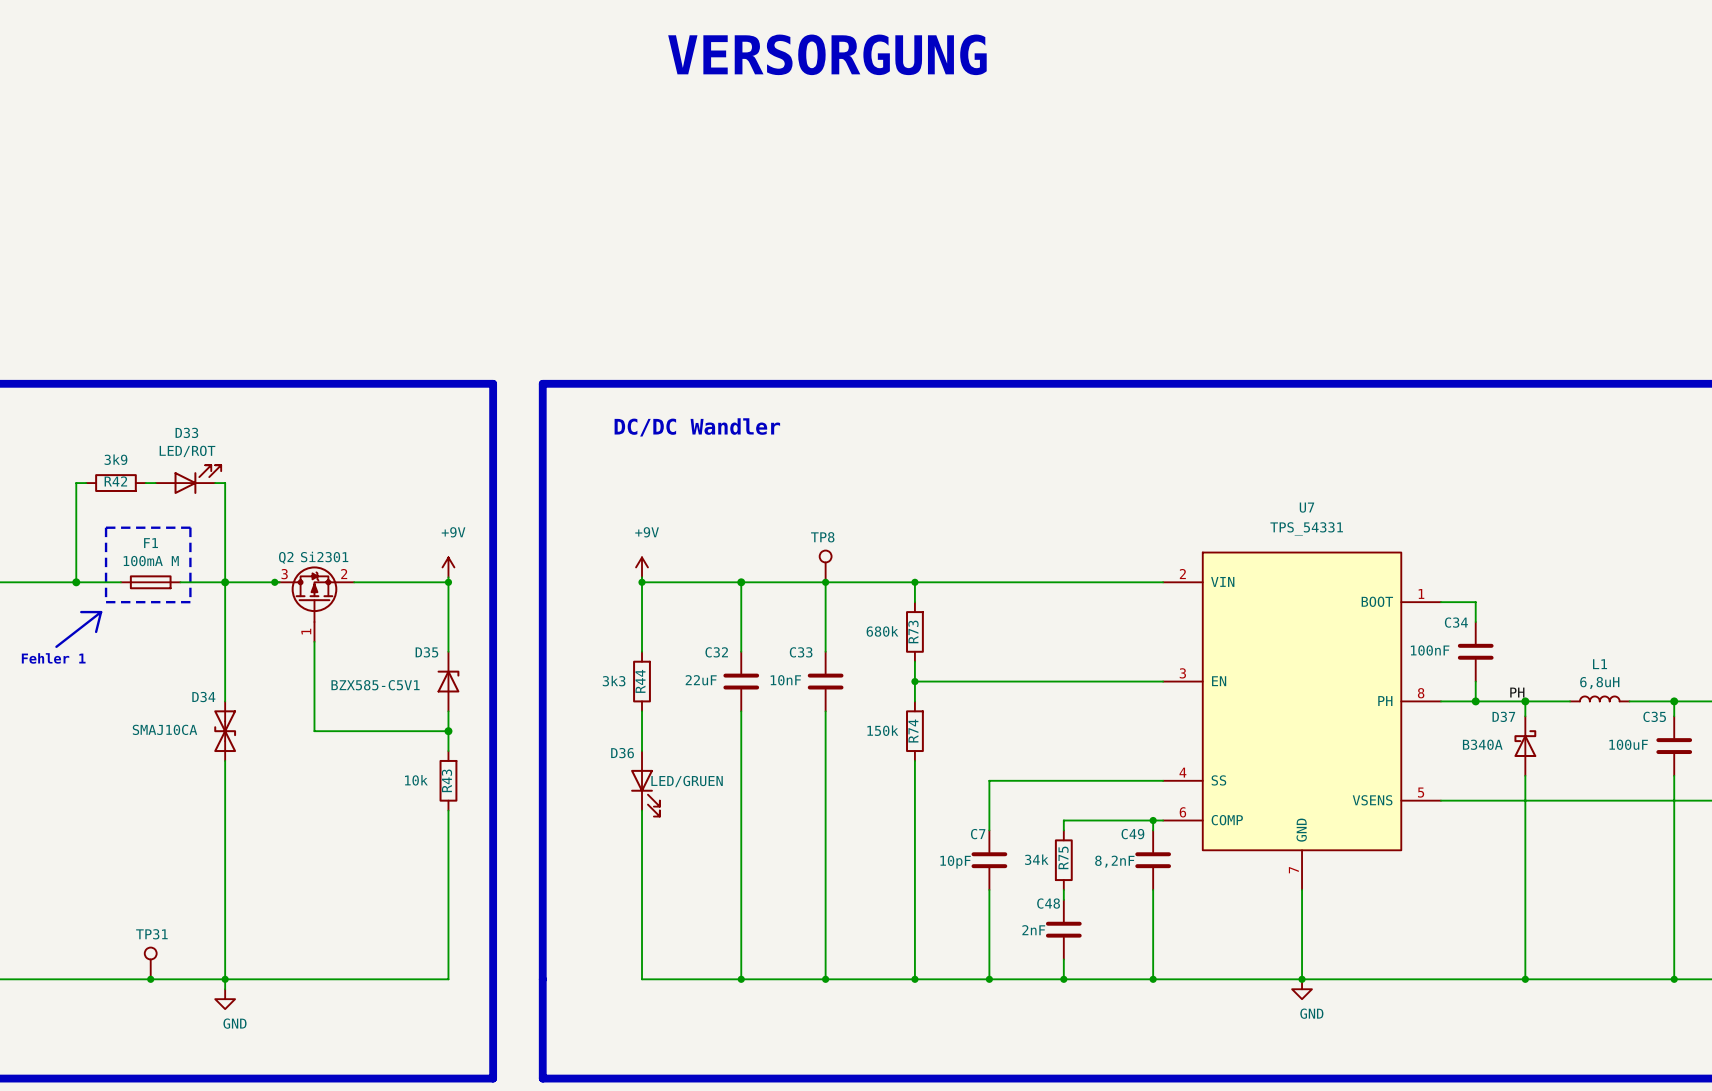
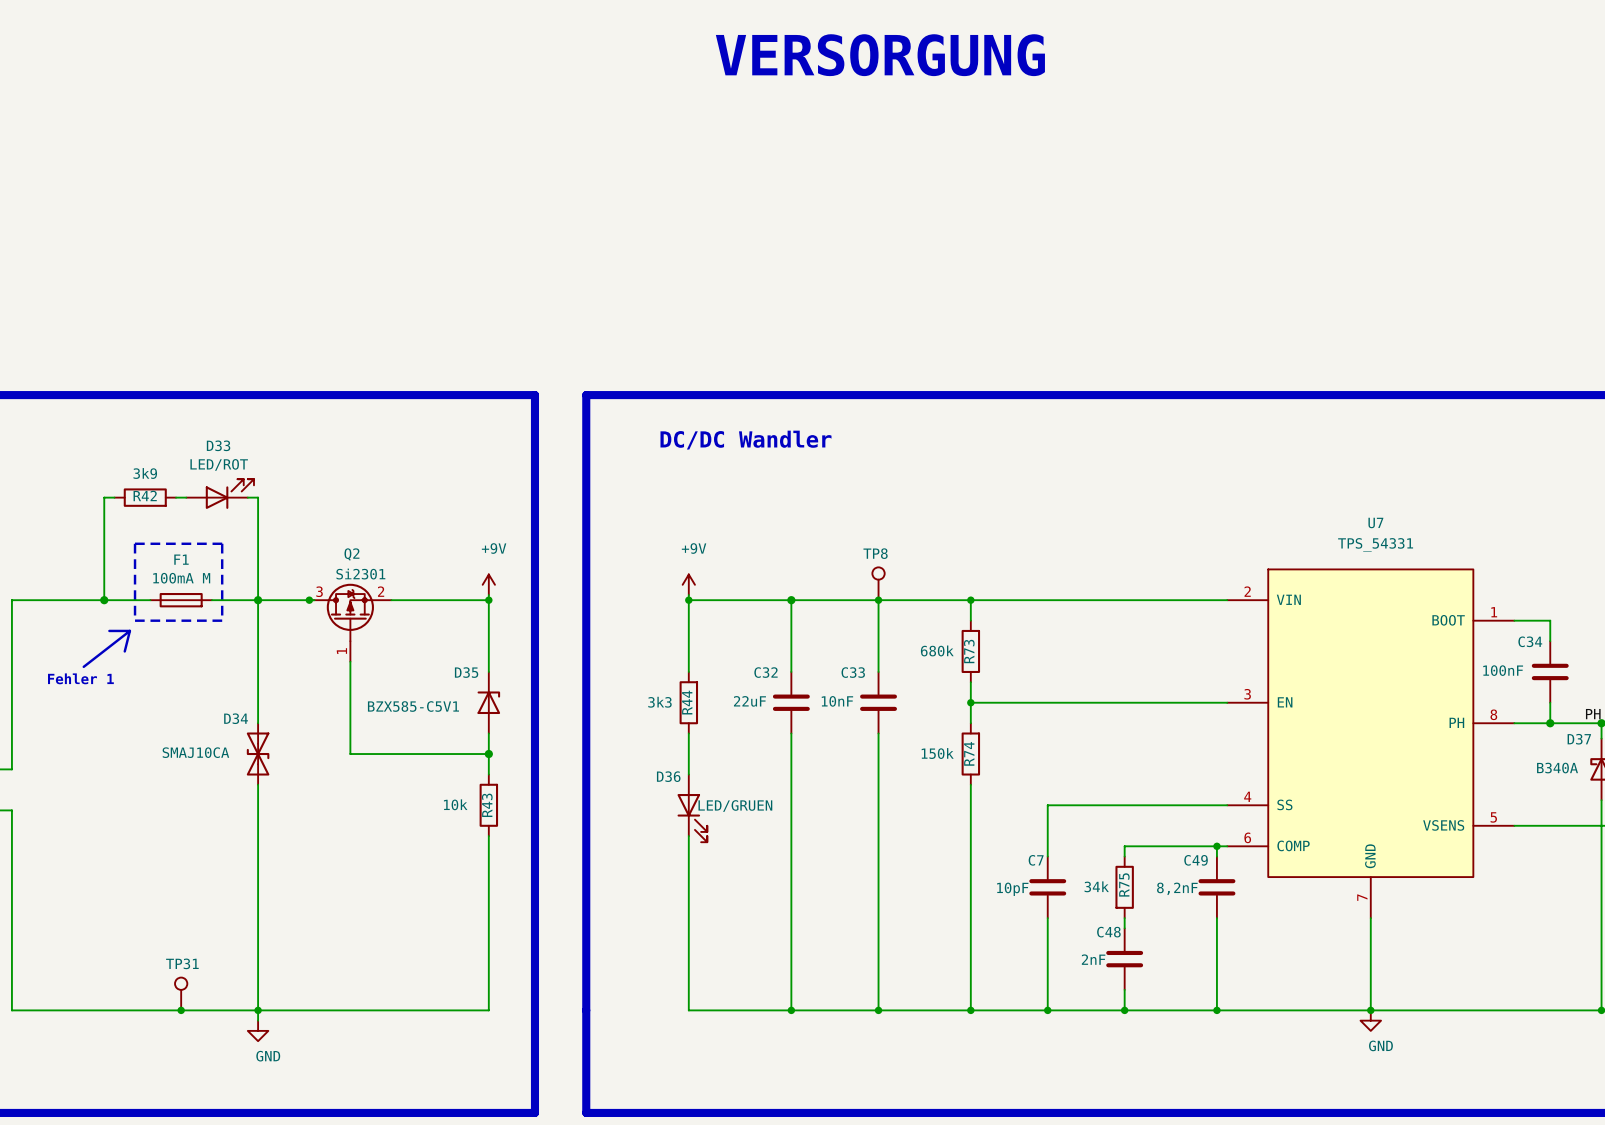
Q2 name position: Q2 (286, 557) -> Q2 (351, 554)

